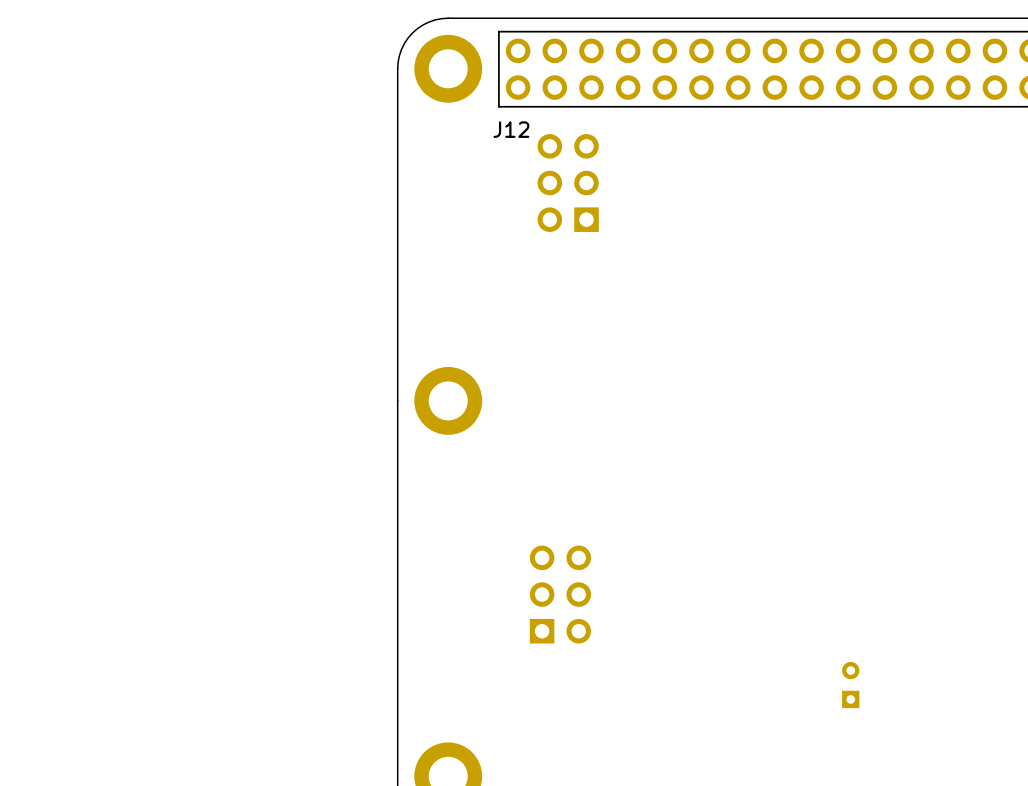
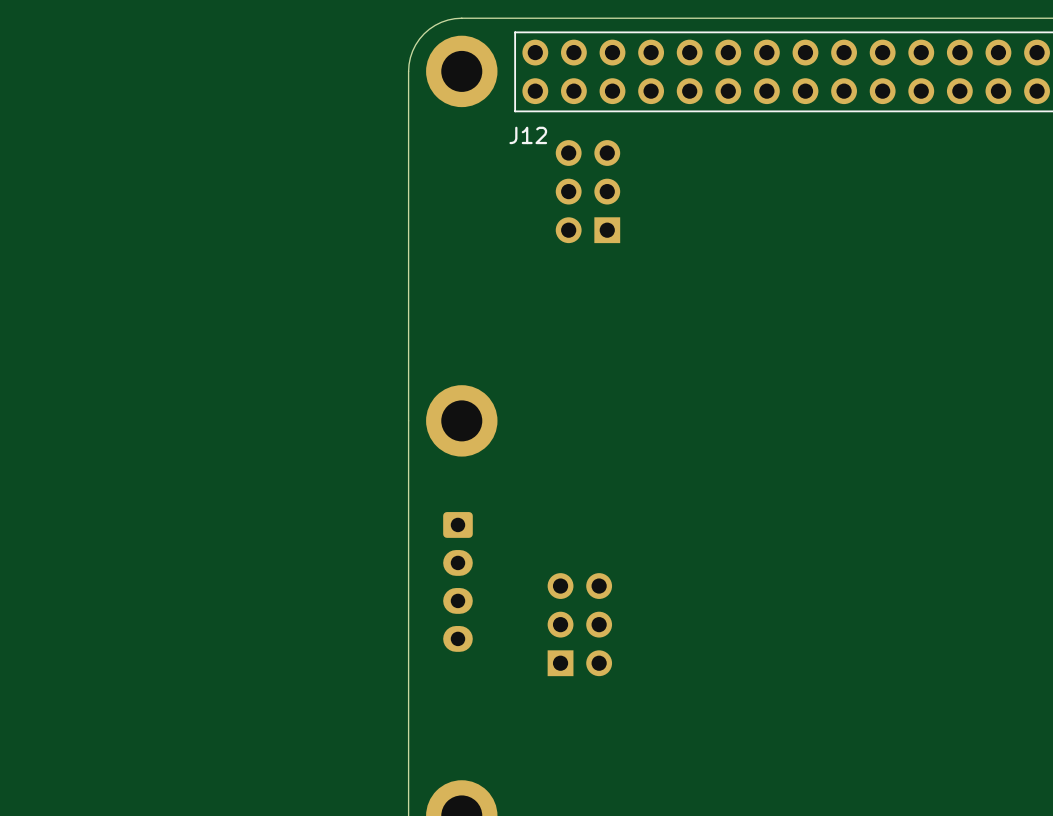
part: none -> (457, 581)
part: (850, 685) -> none

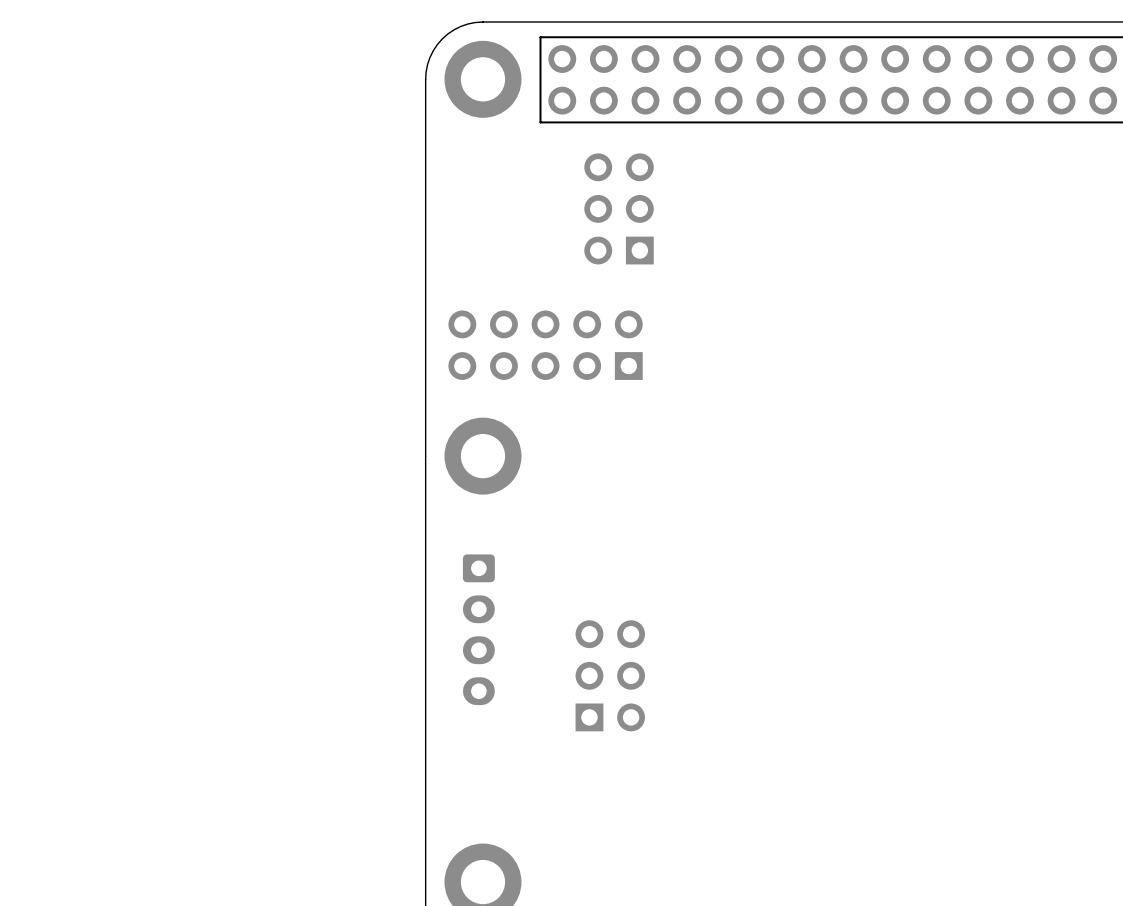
J12 name: J12 (528, 135) -> none
part: none -> (545, 345)

